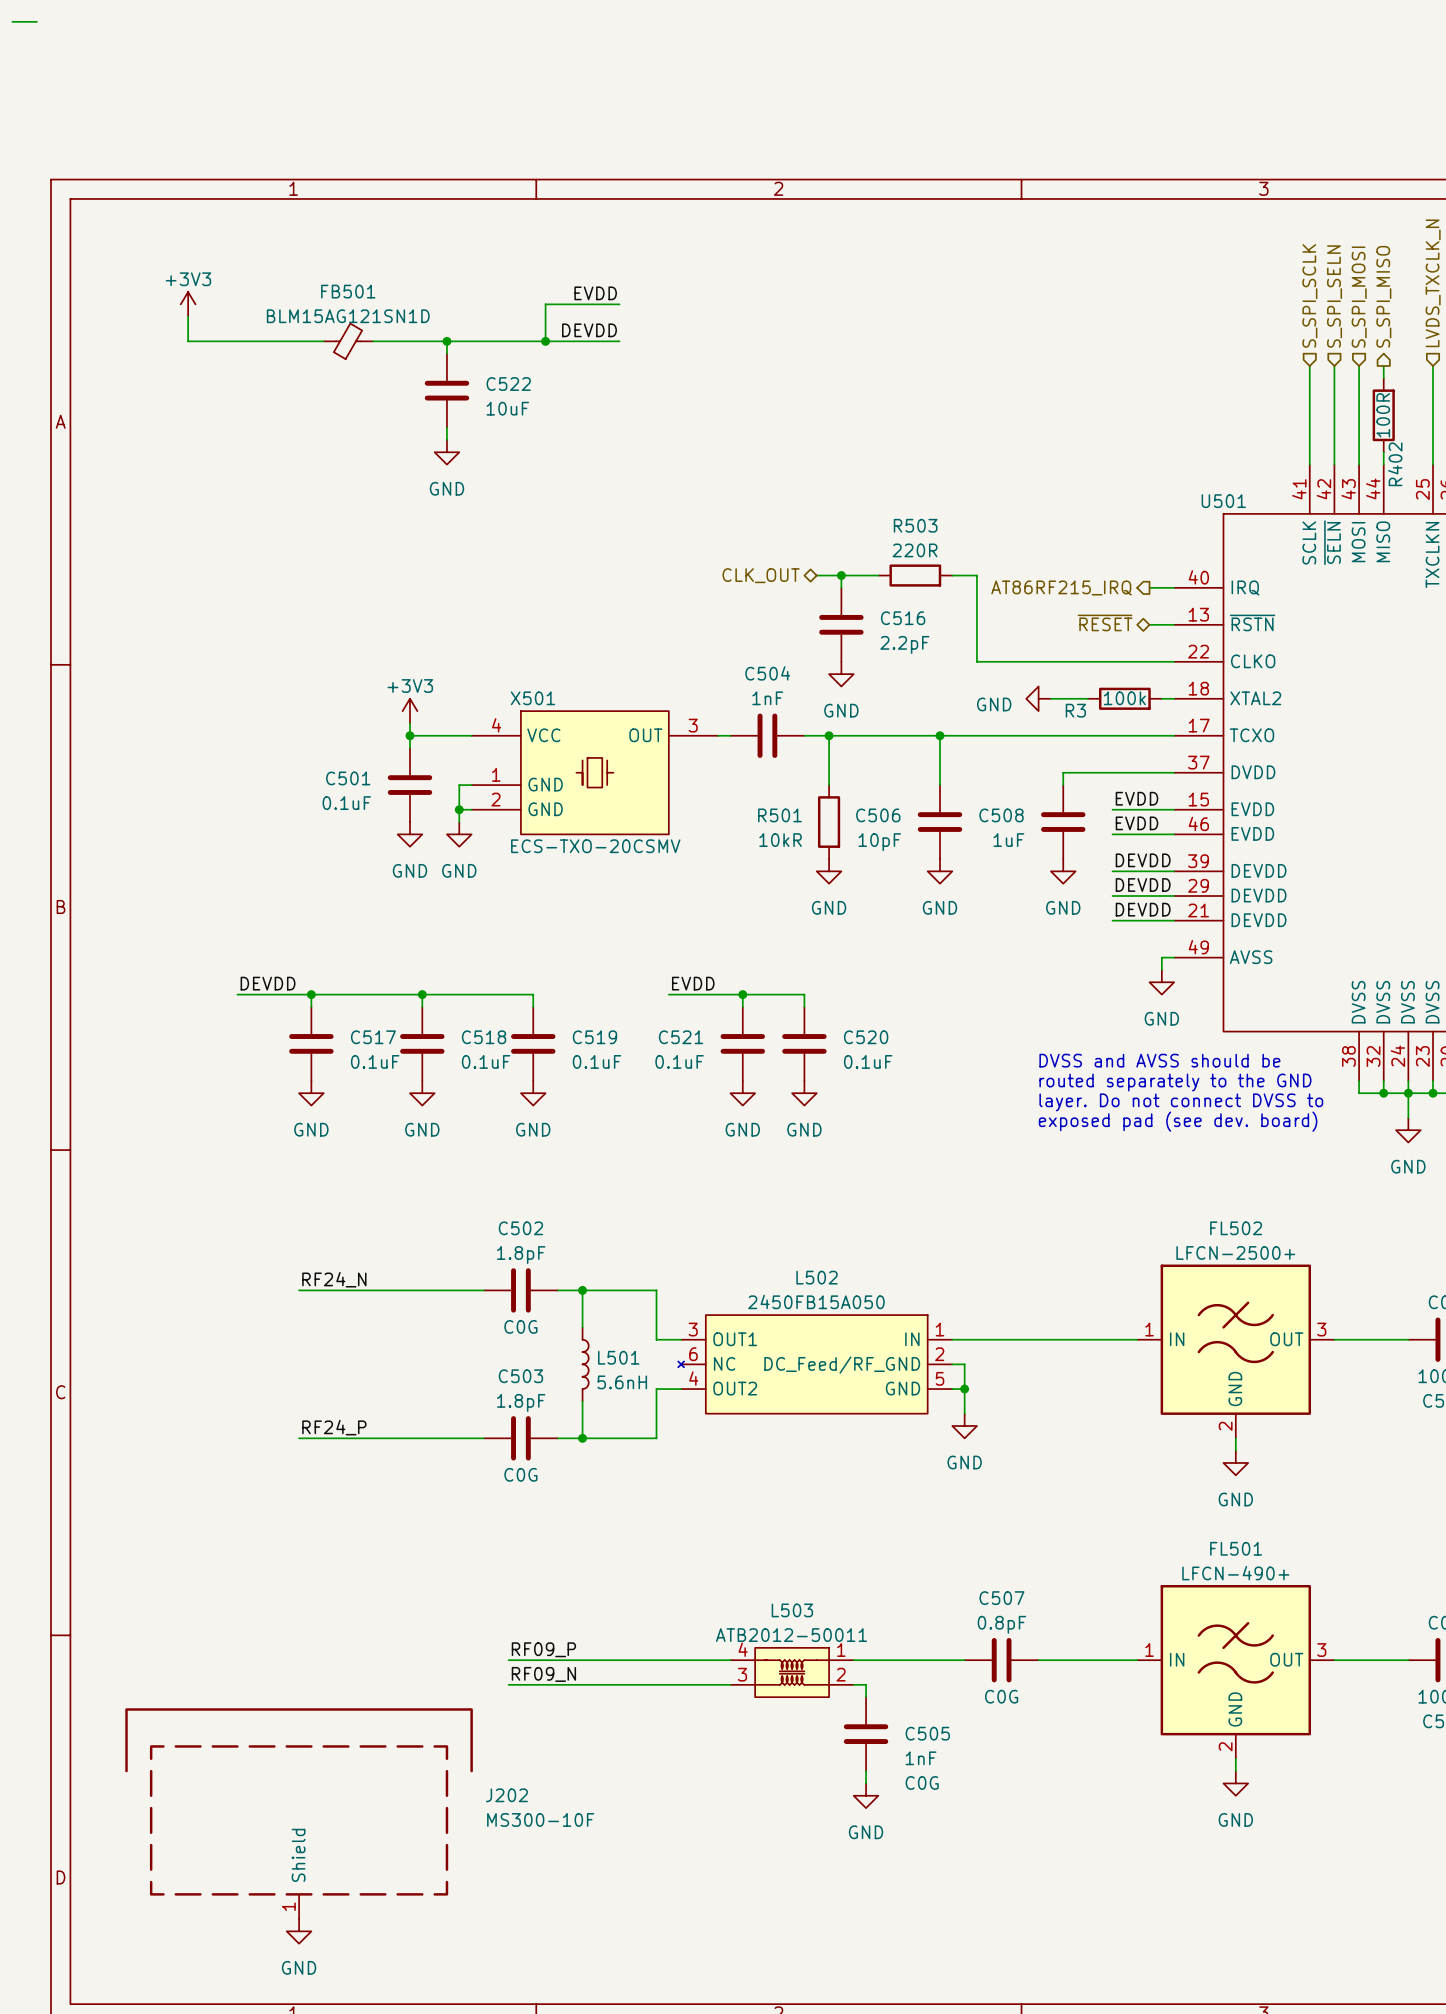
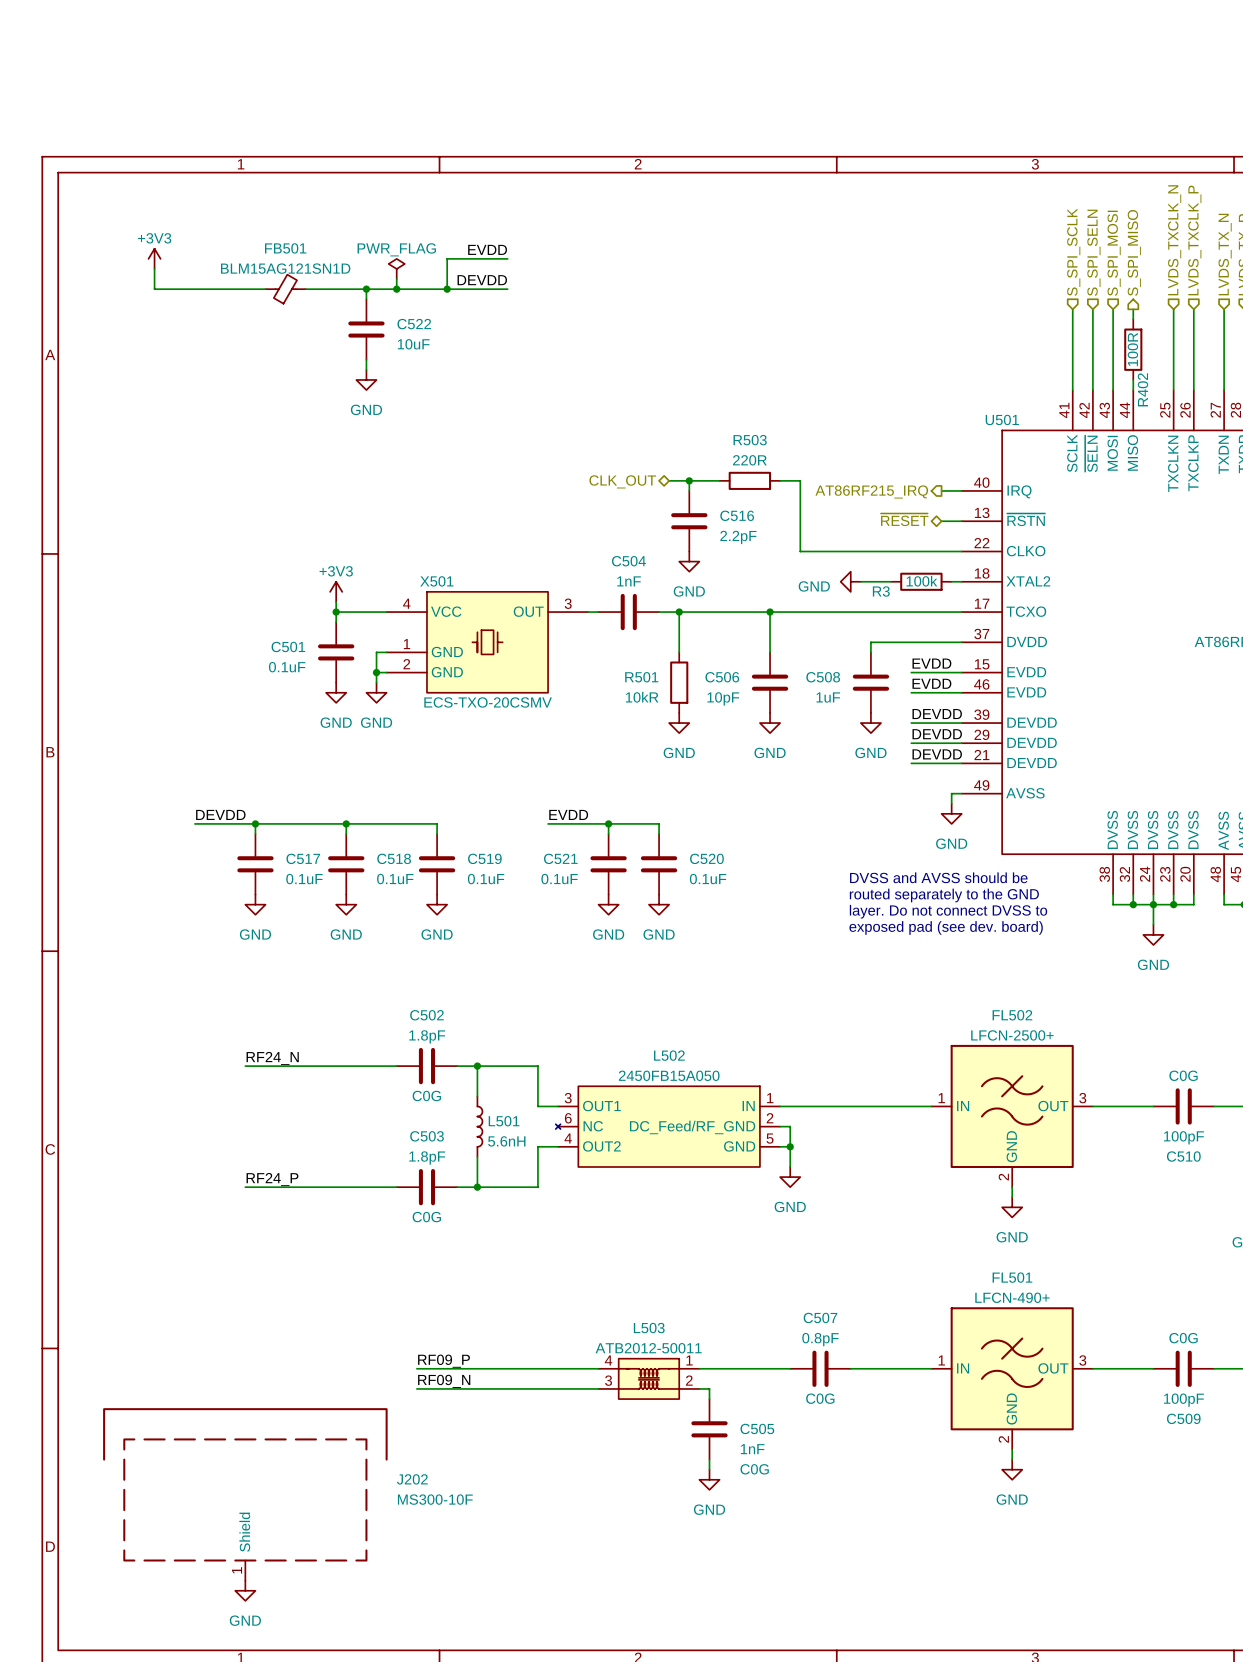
wire: (12, 21) (36, 21) -> none
power symbol: none -> PWR_FLAG (396, 268)
wire: none -> (396, 279) (396, 289)
junction: none -> (396, 289)

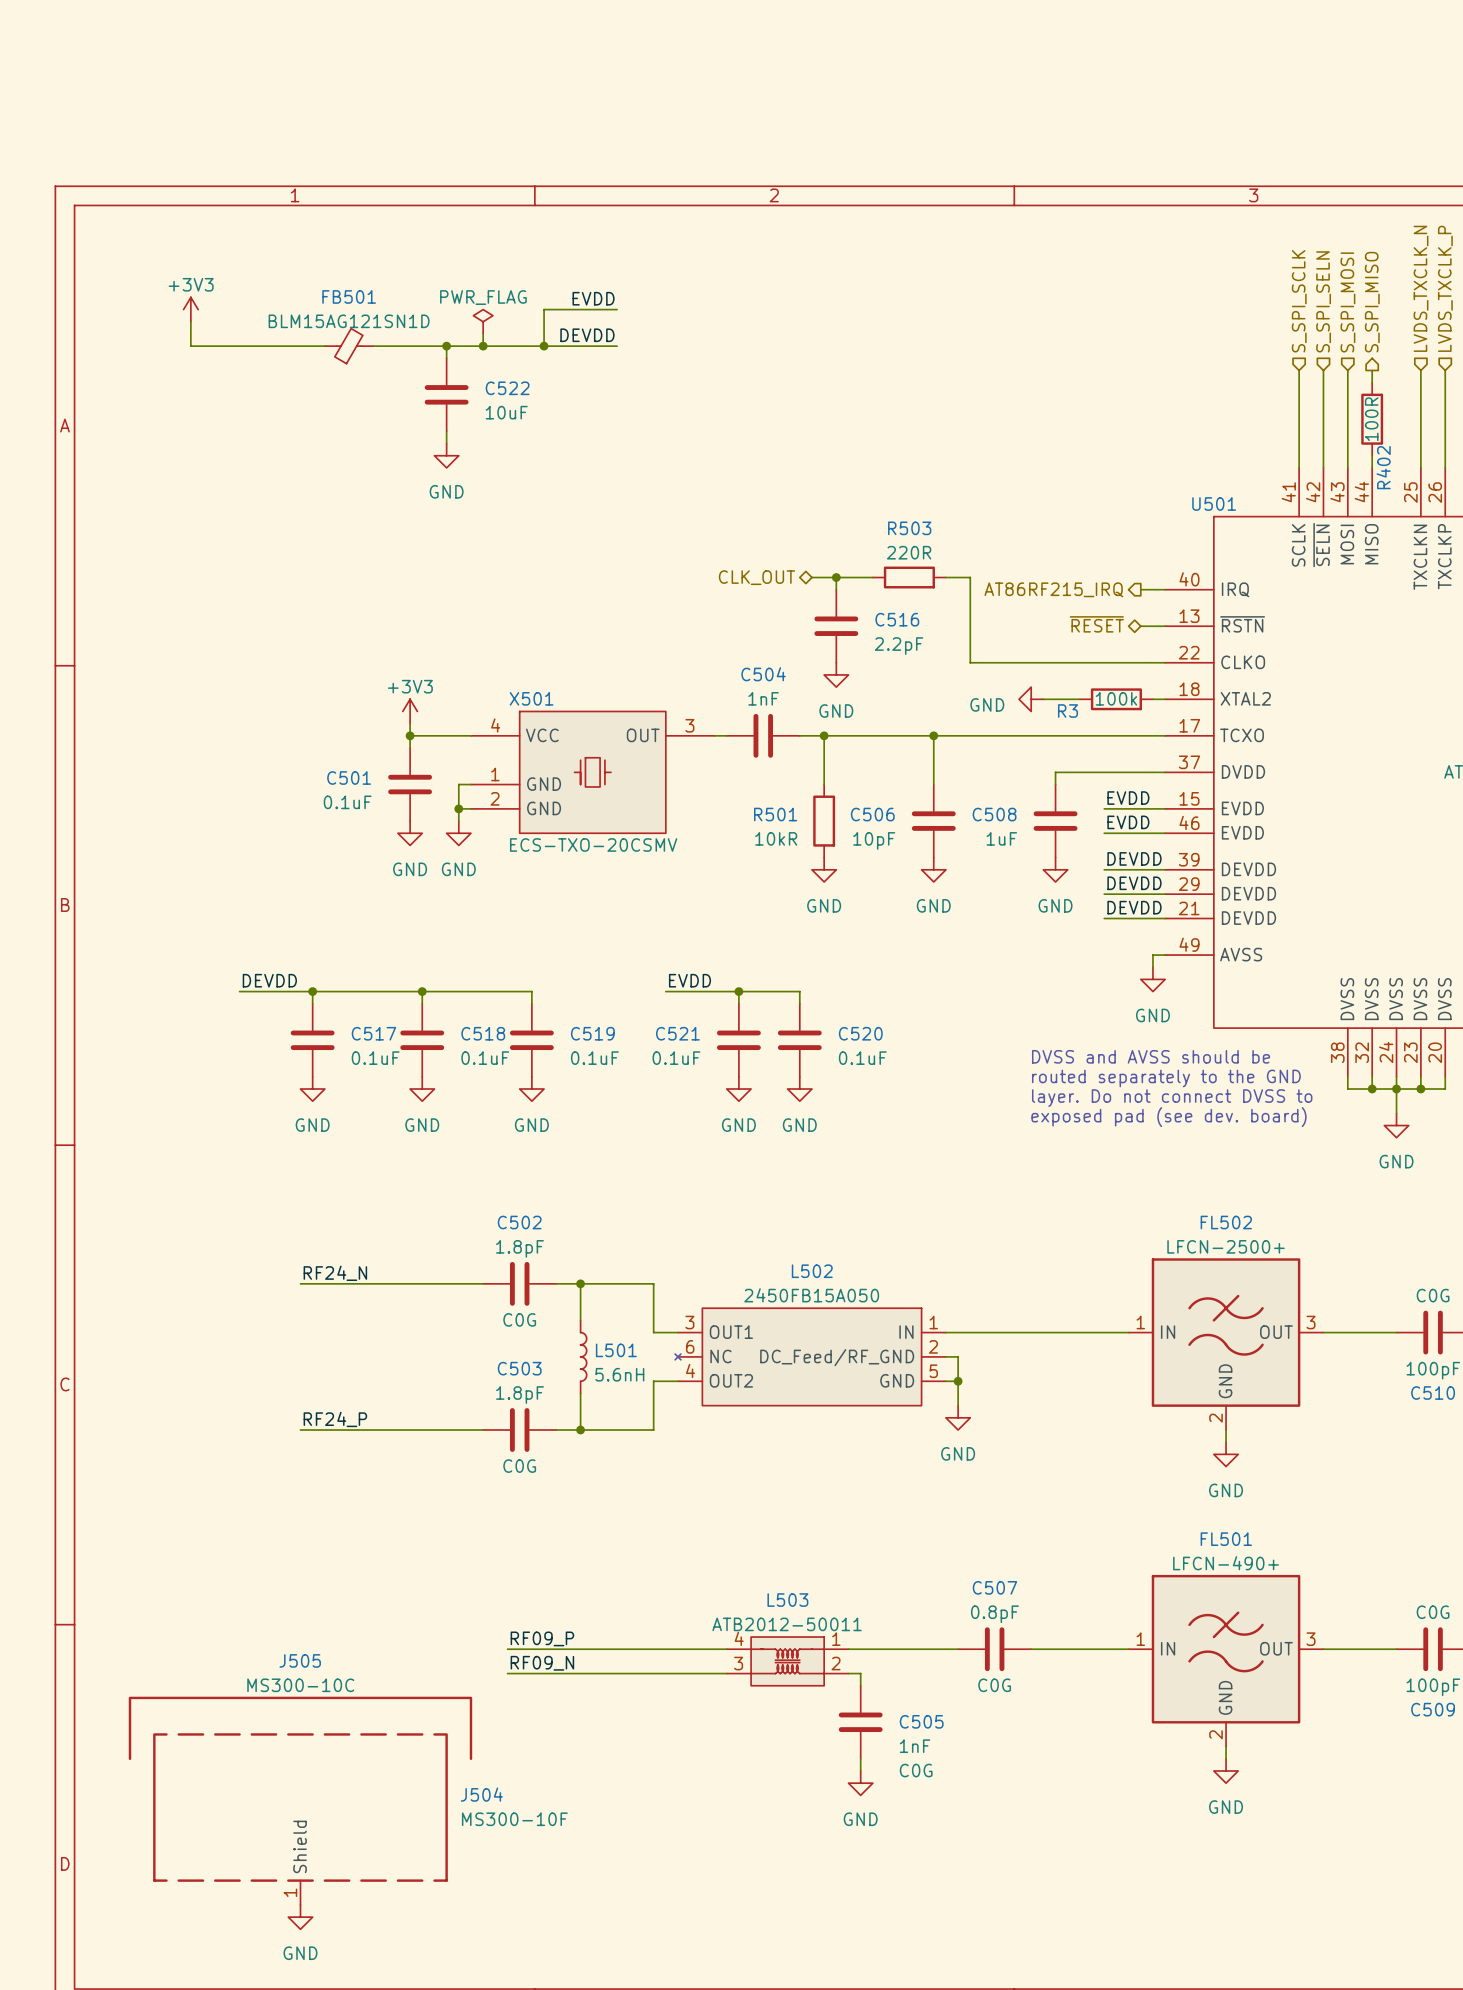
J505: none -> MS300-10C (300, 1728)
J202: MS300-10F (245, 1494) -> none
J504: none -> MS300-10F (300, 1819)

